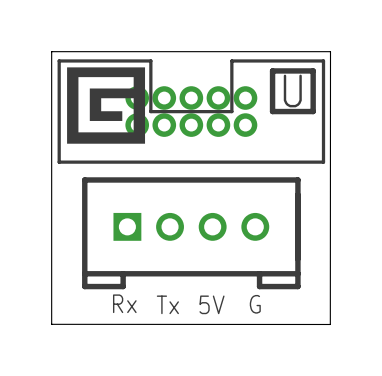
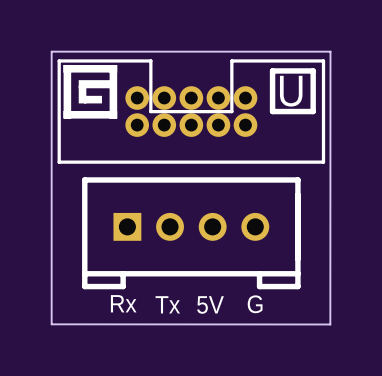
drawing: none -> [63, 64, 118, 119]
drawing: [67, 67, 146, 144] -> none
drawing shape: [89, 109, 102, 112] -> [63, 111, 118, 119]

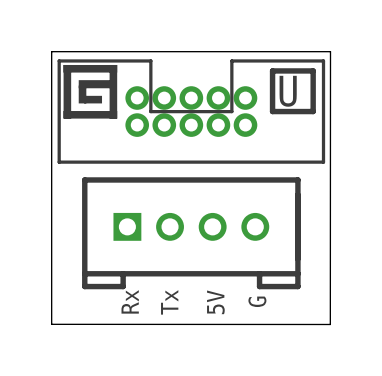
text rotation: 0° (123, 303) -> 90° counterclockwise (130, 301)
text rotation: 0° (167, 304) -> 90° counterclockwise (169, 302)
text rotation: 0° (210, 304) -> 90° counterclockwise (215, 302)
text rotation: 0° (255, 304) -> 90° counterclockwise (257, 301)

